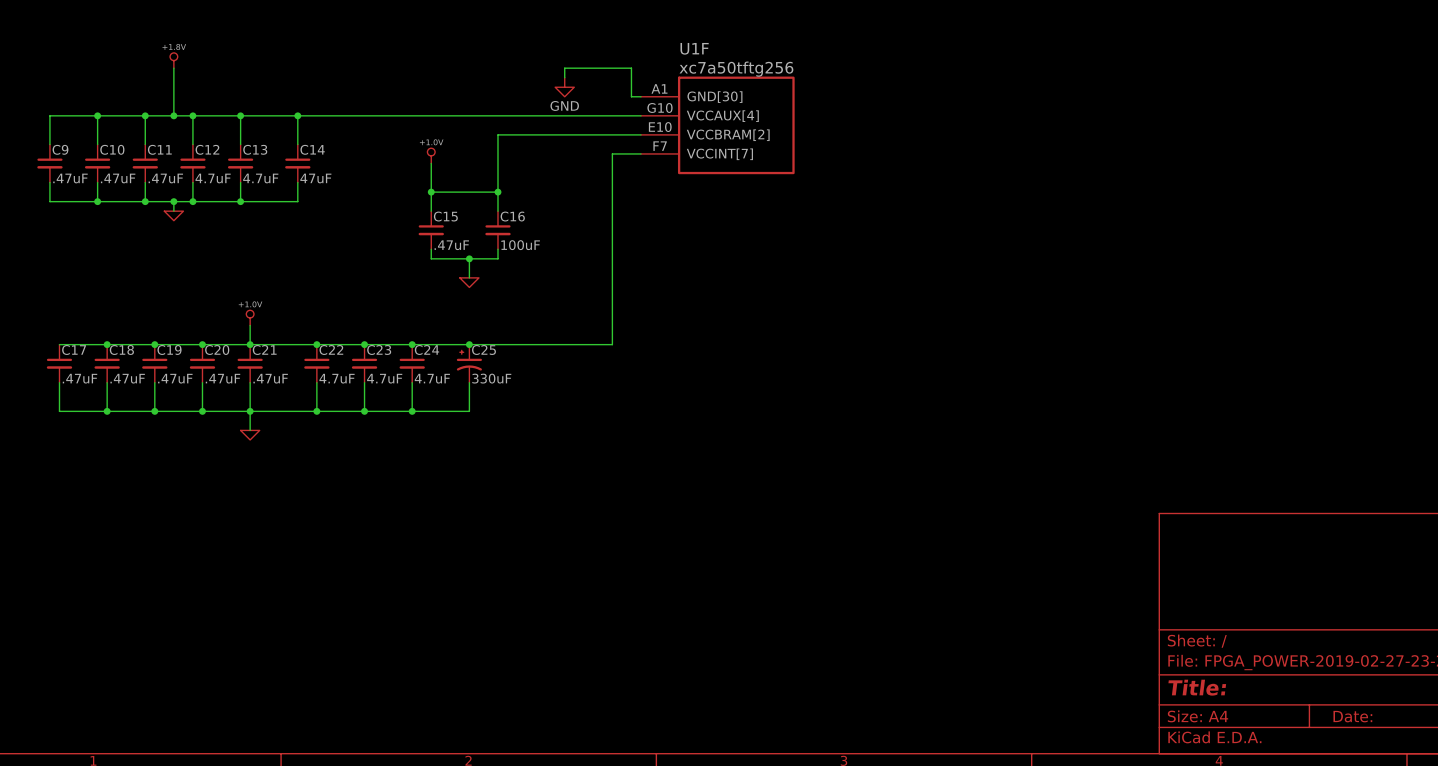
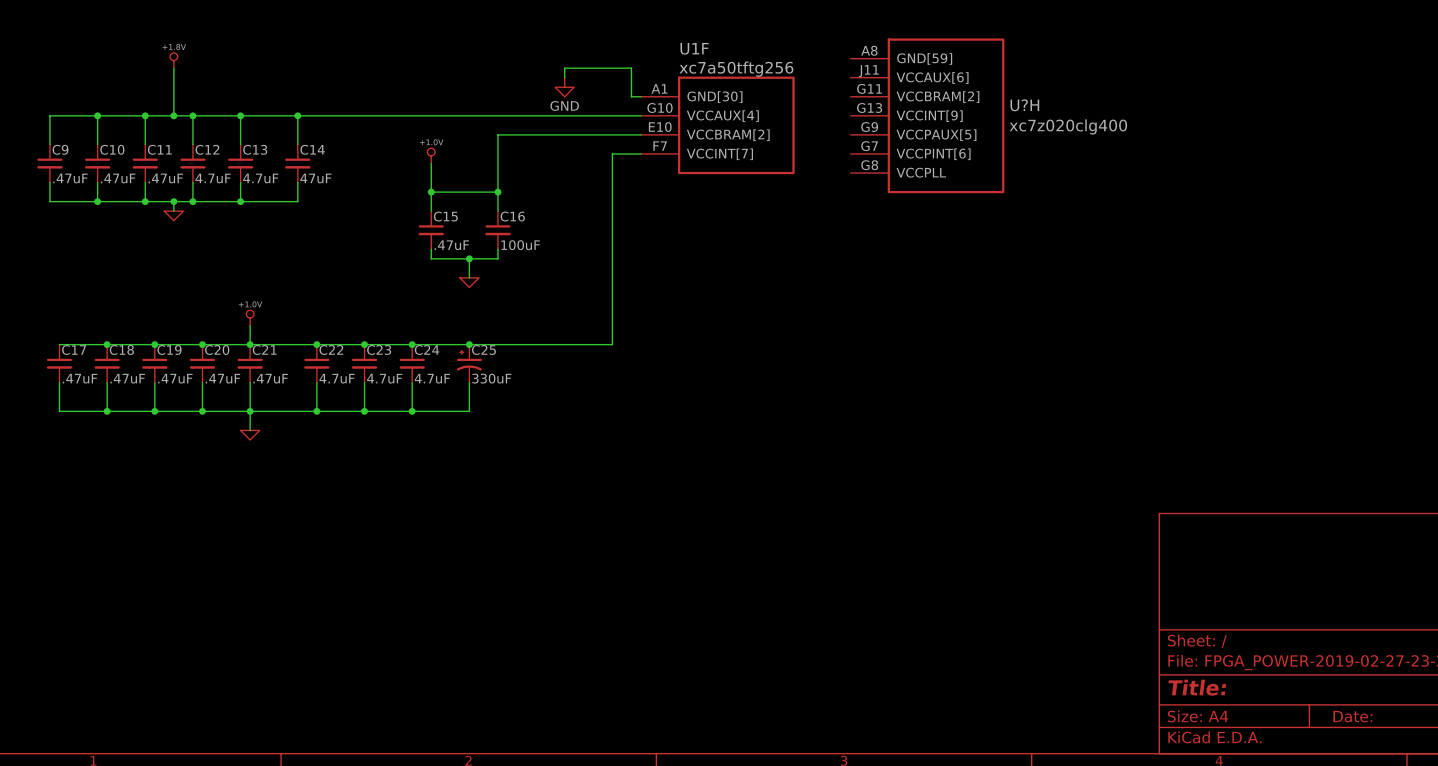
U?H: none -> xc7z020clg400 (927, 115)

